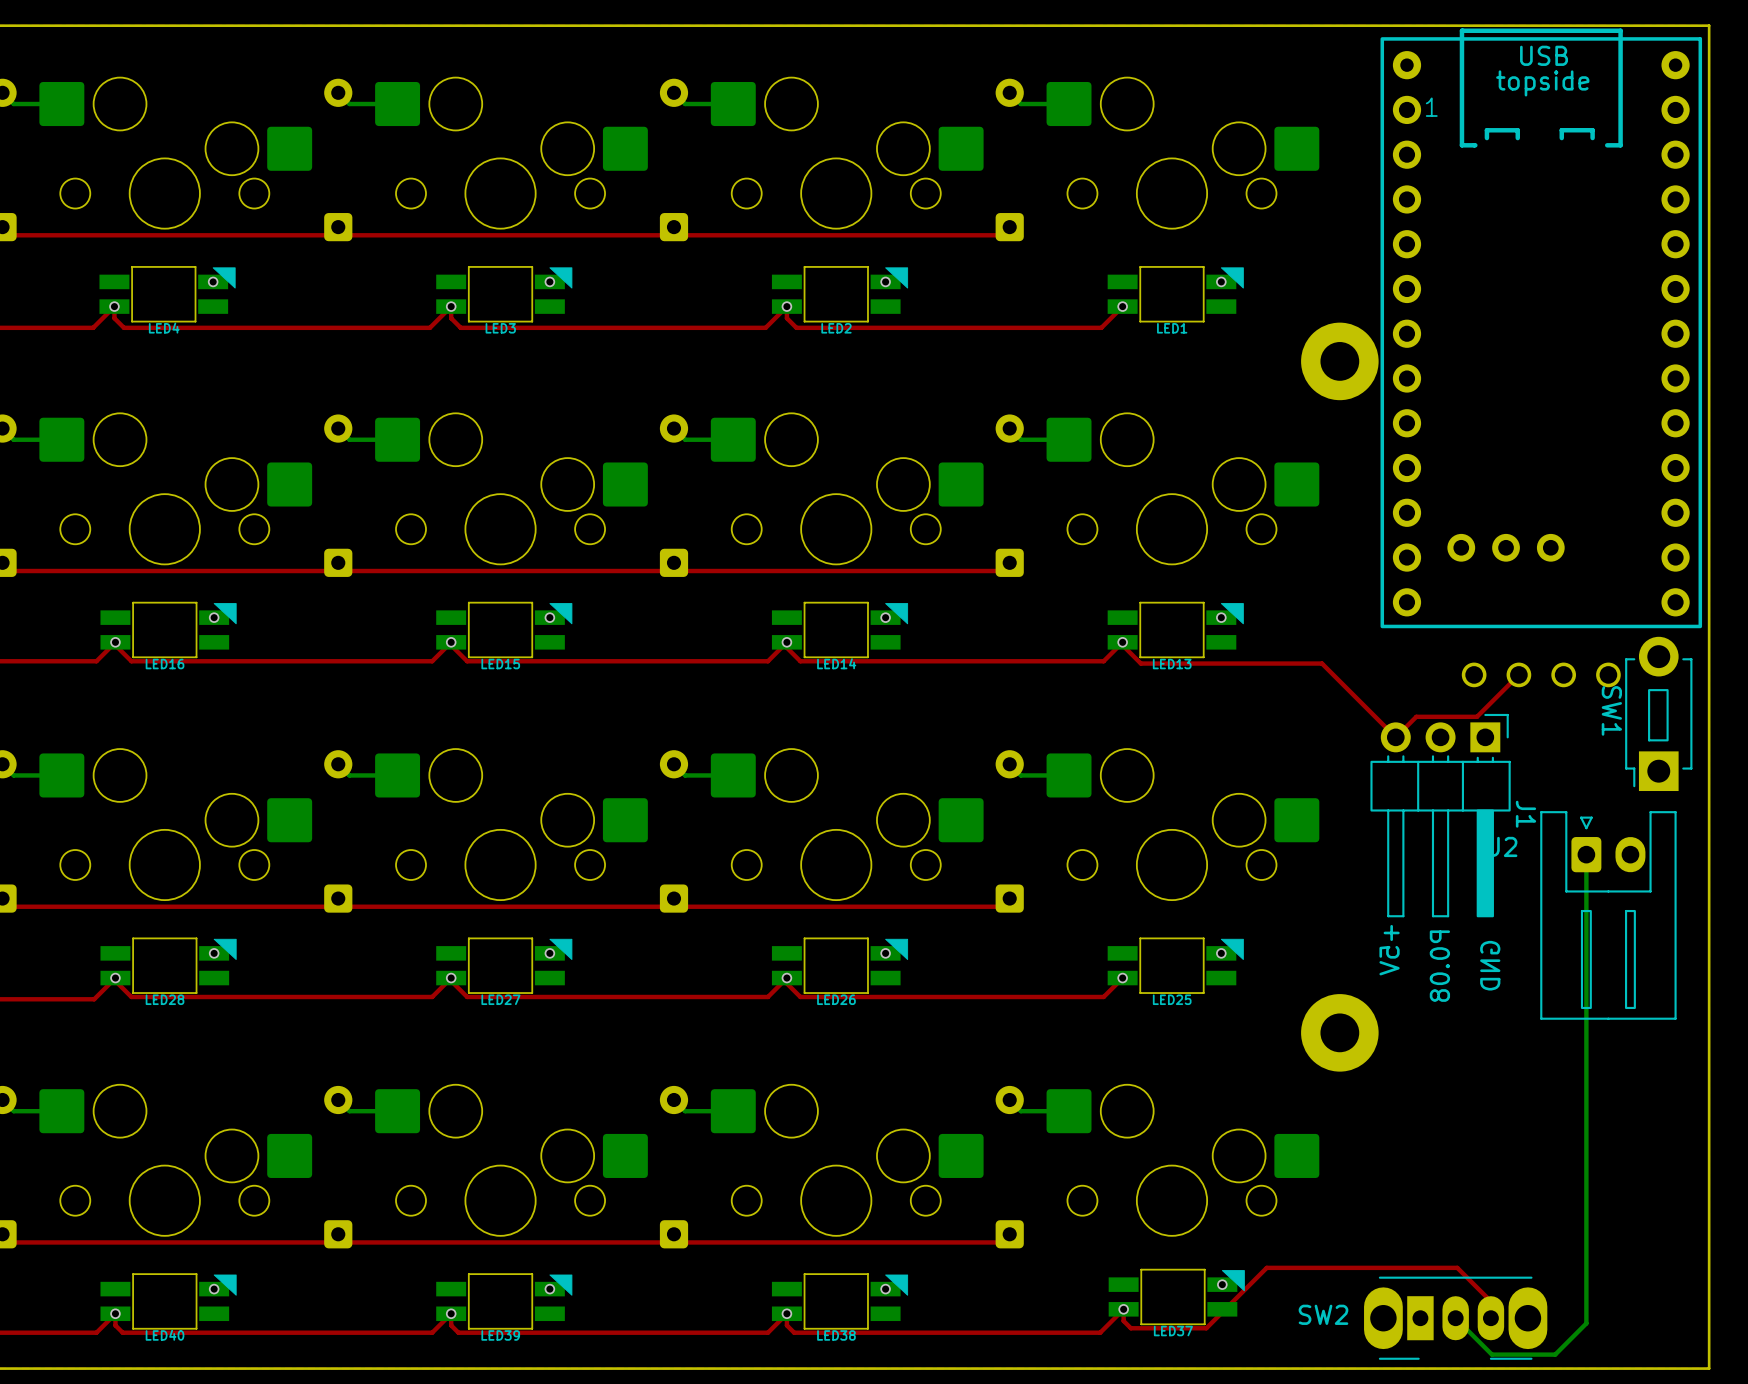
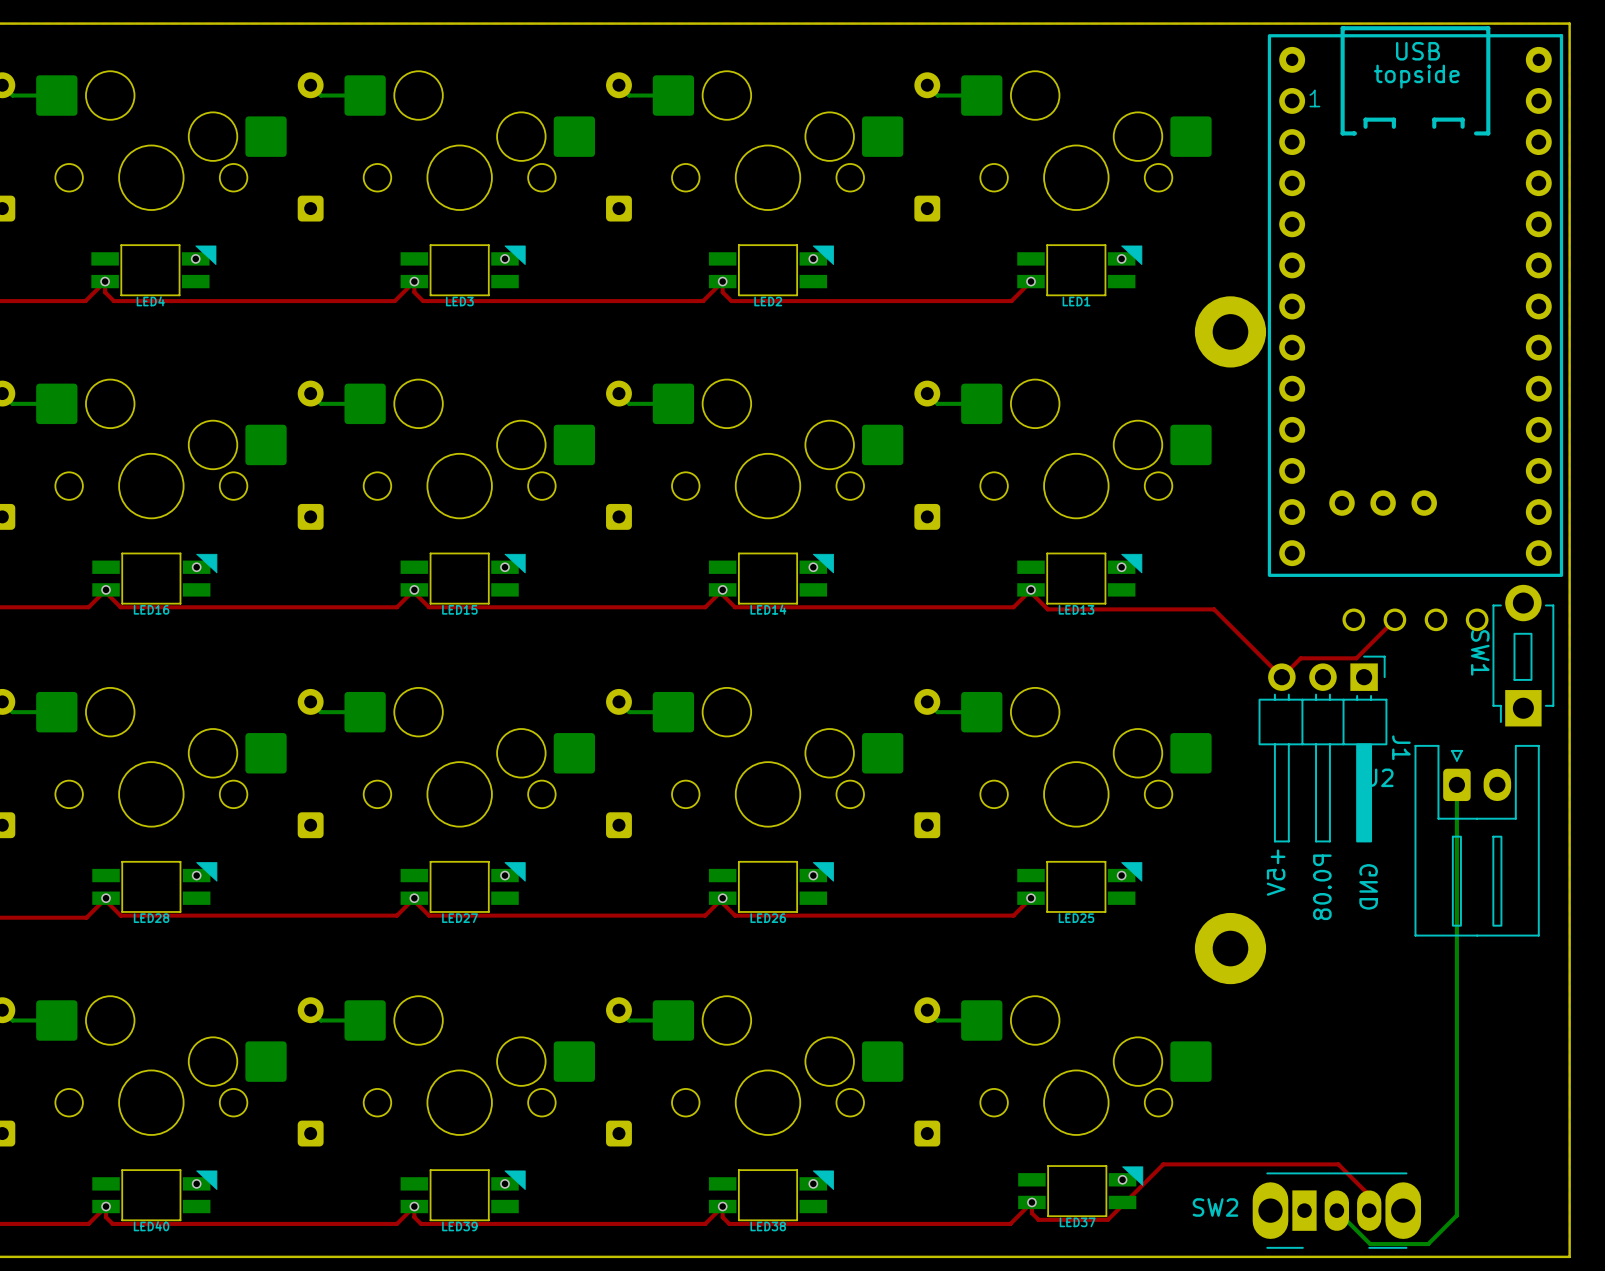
top track: (330, 235) (10, 235) -> none
top track: (665, 235) (346, 235) -> none
top track: (1001, 235) (682, 235) -> none
top track: (330, 571) (10, 571) -> none
top track: (665, 571) (346, 571) -> none
top track: (1001, 571) (682, 571) -> none
top track: (330, 906) (10, 906) -> none
top track: (665, 906) (346, 906) -> none
top track: (1001, 906) (682, 906) -> none
top track: (330, 1242) (10, 1242) -> none
top track: (665, 1242) (346, 1242) -> none
top track: (1001, 1242) (682, 1242) -> none

